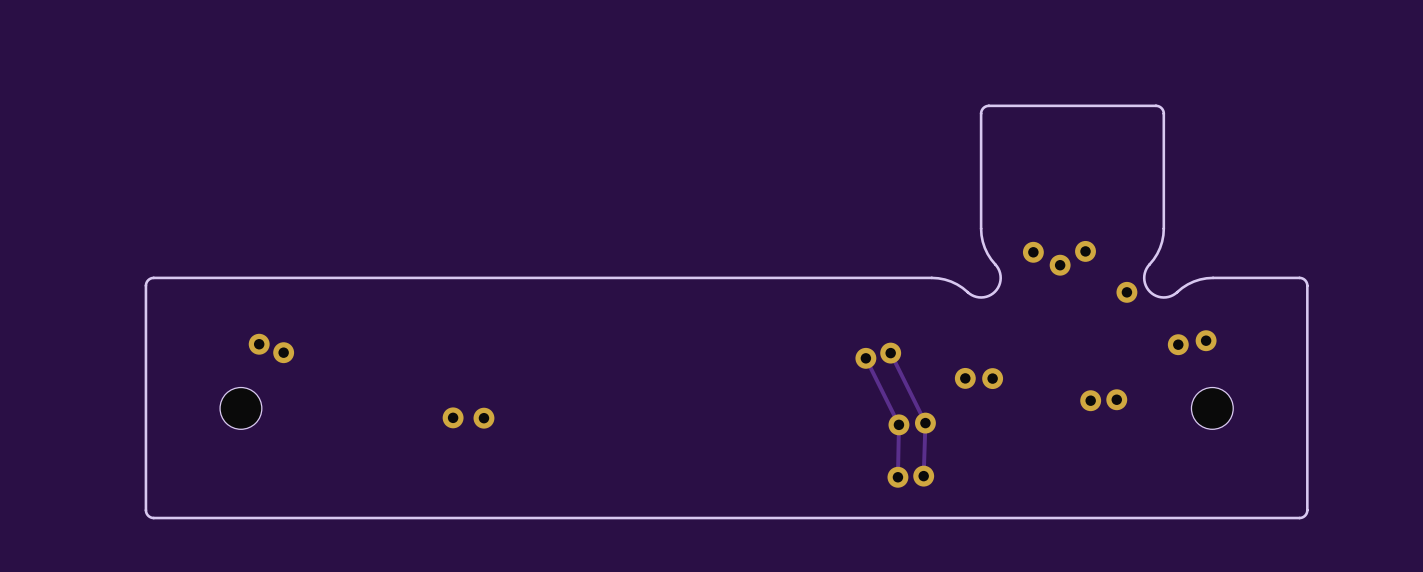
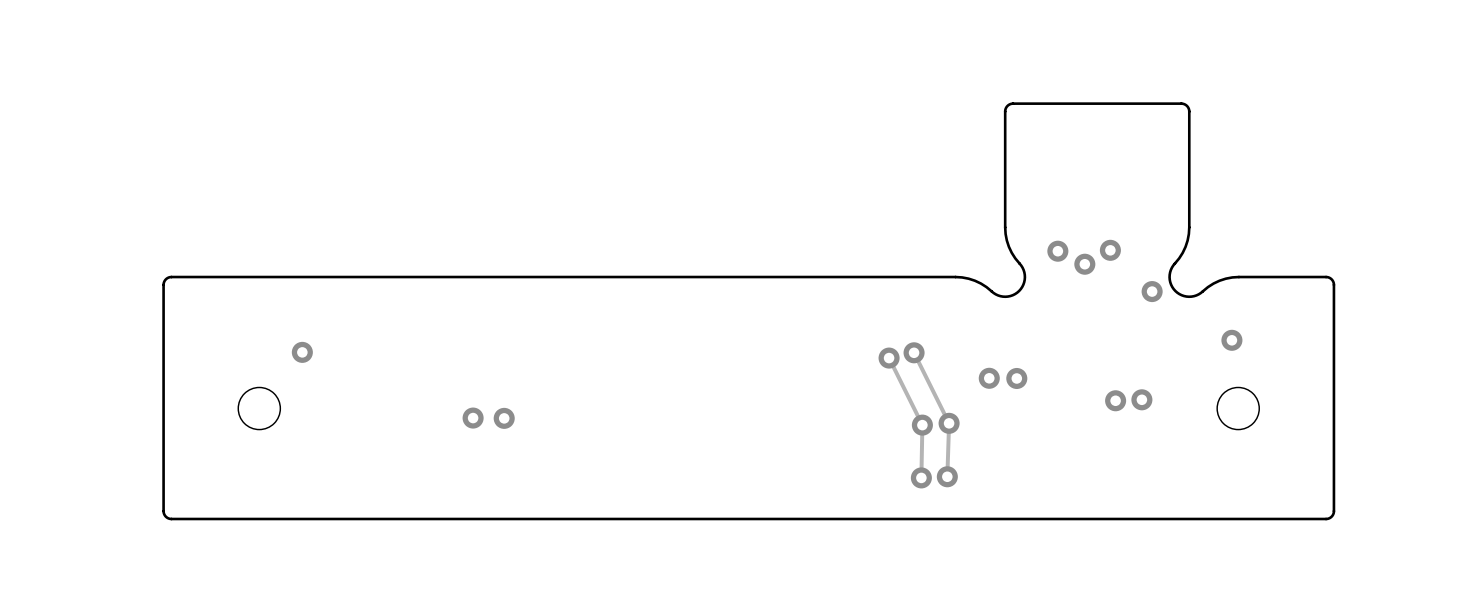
via: (259, 344) -> none
via: (1178, 344) -> none

